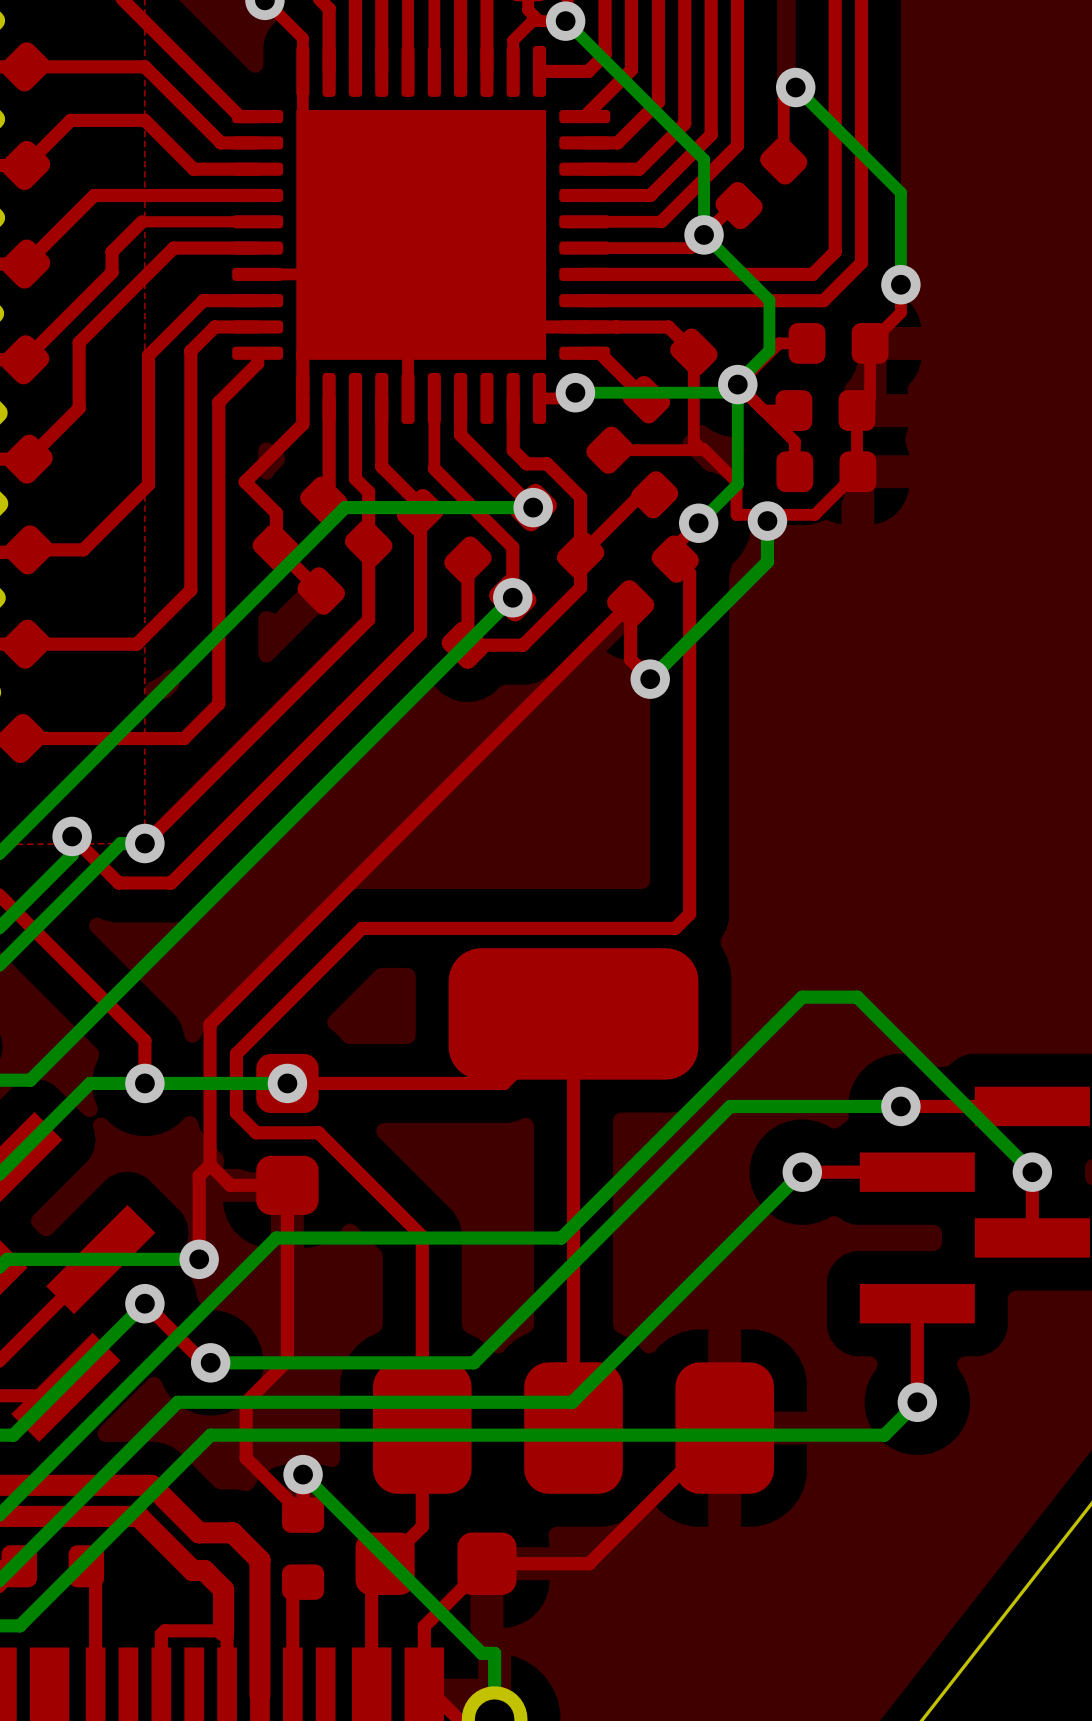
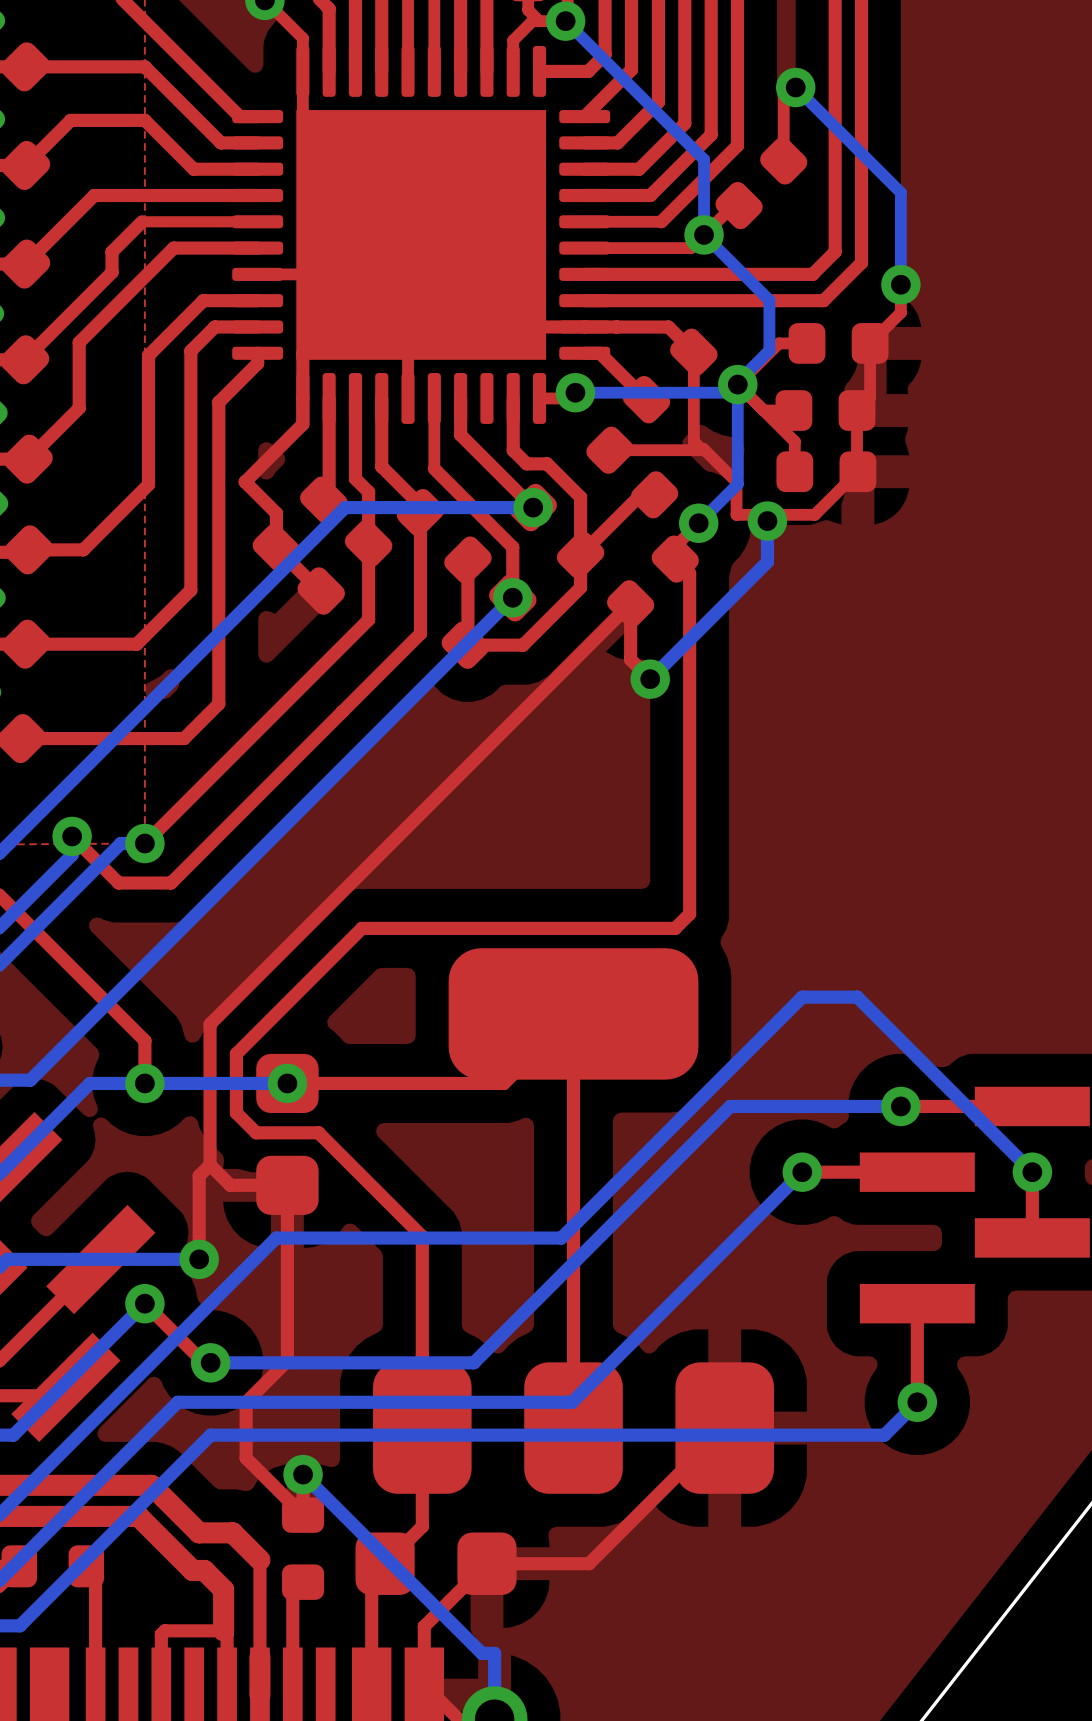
top track width: thick (259, 1560) (259, 1657) -> thin (259, 1560) (259, 1657)

